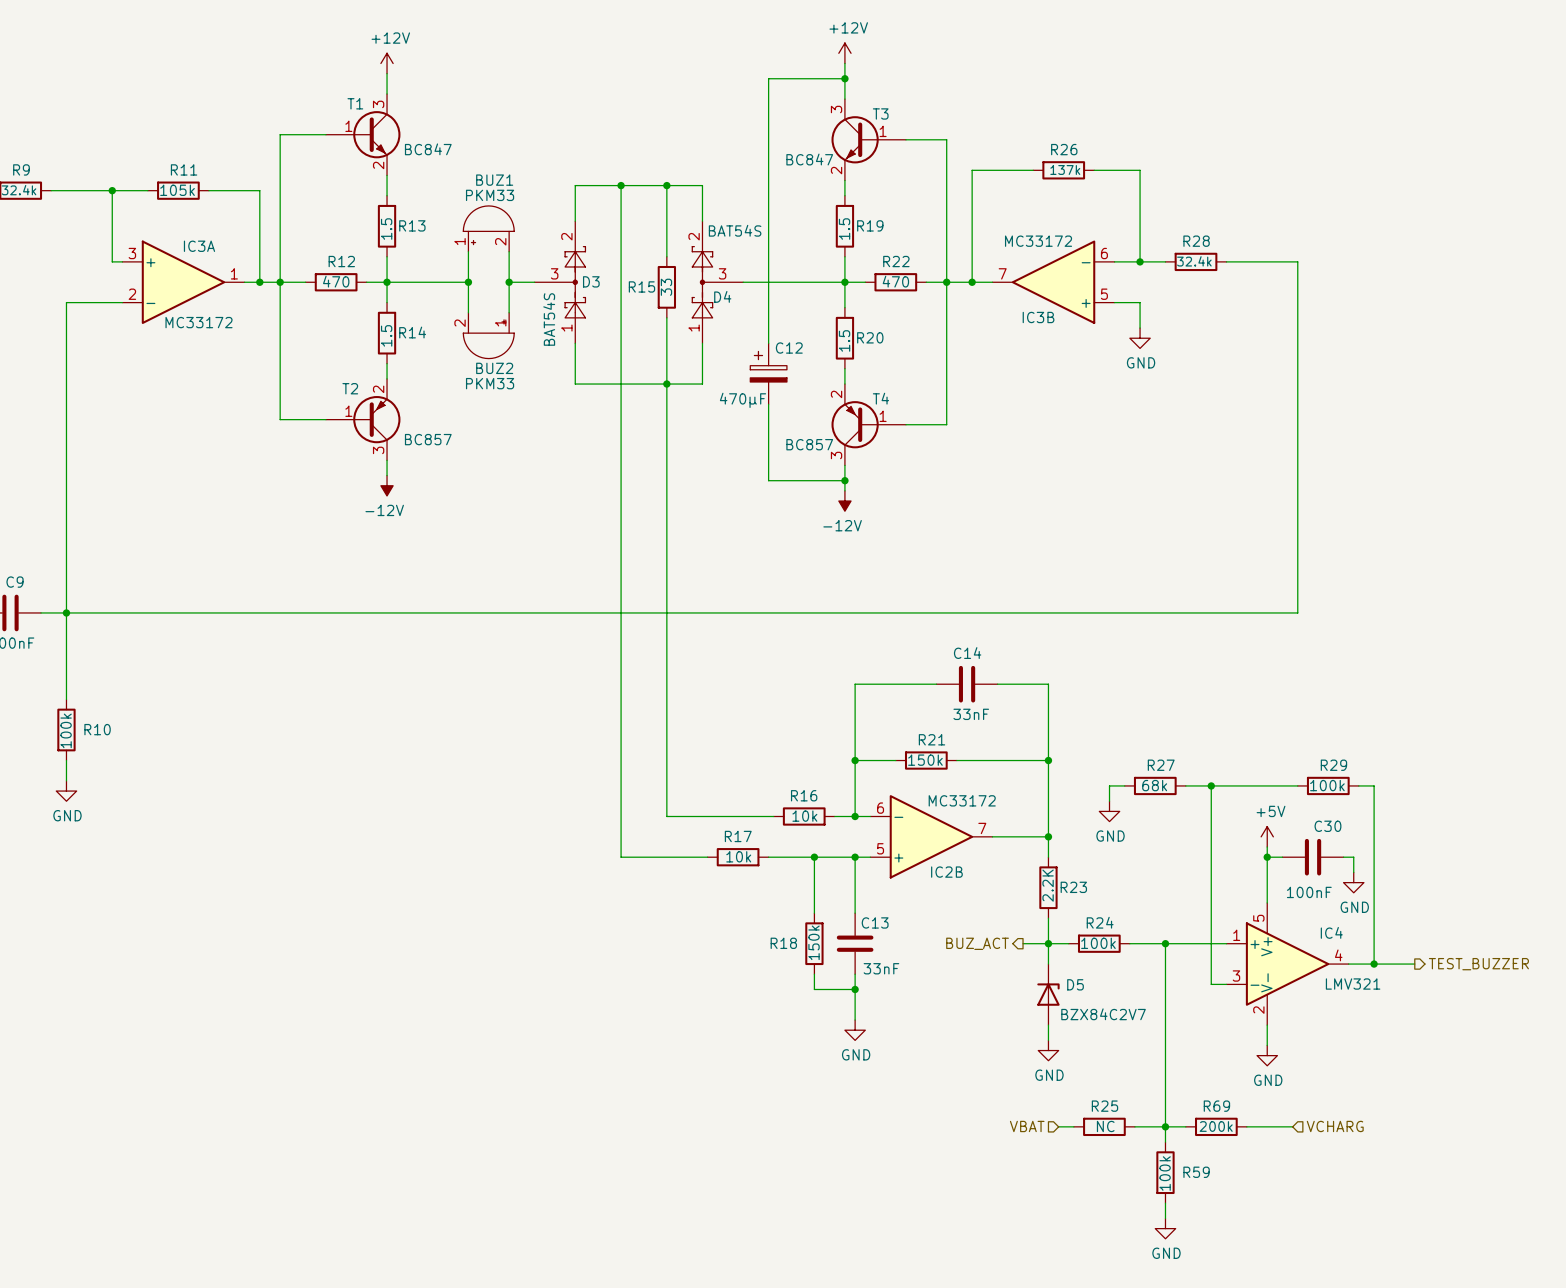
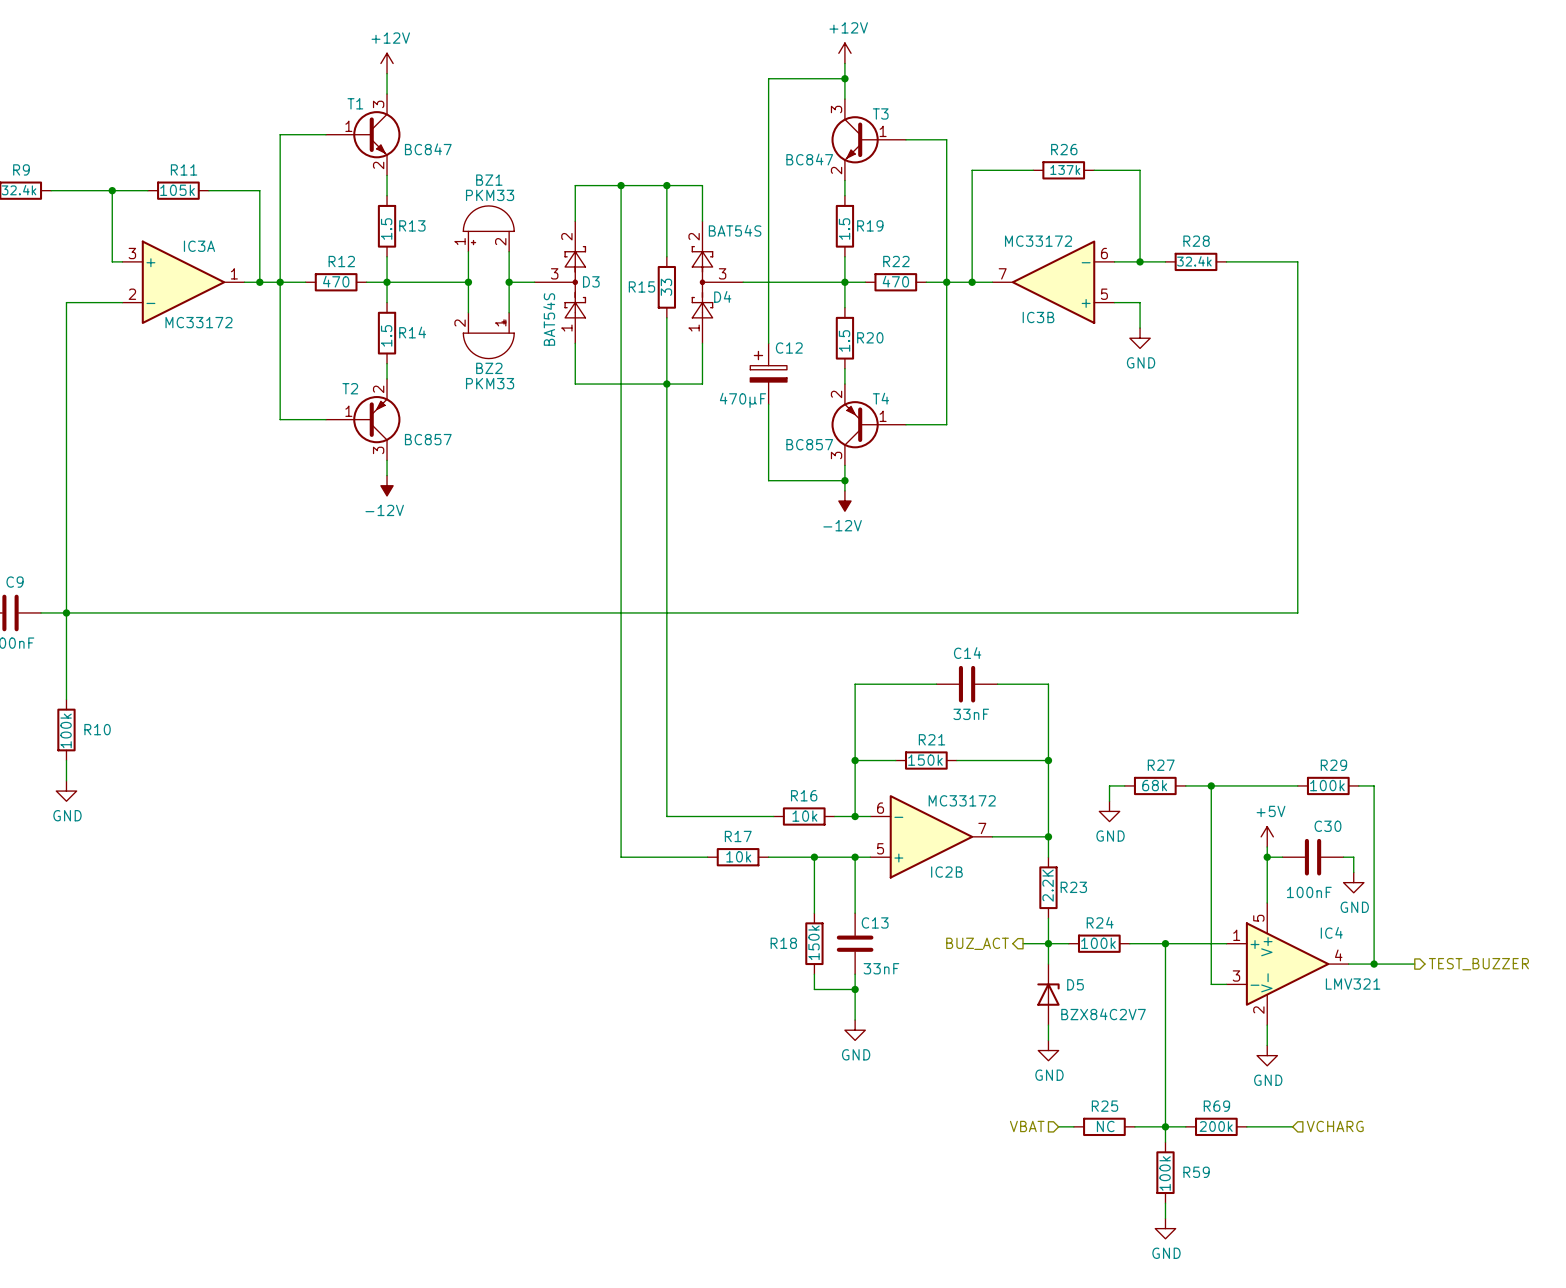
BUZ1 name: BUZ1 (494, 180) -> BZ1 (489, 180)
BUZ2 name: BUZ2 (494, 368) -> BZ2 (489, 368)

